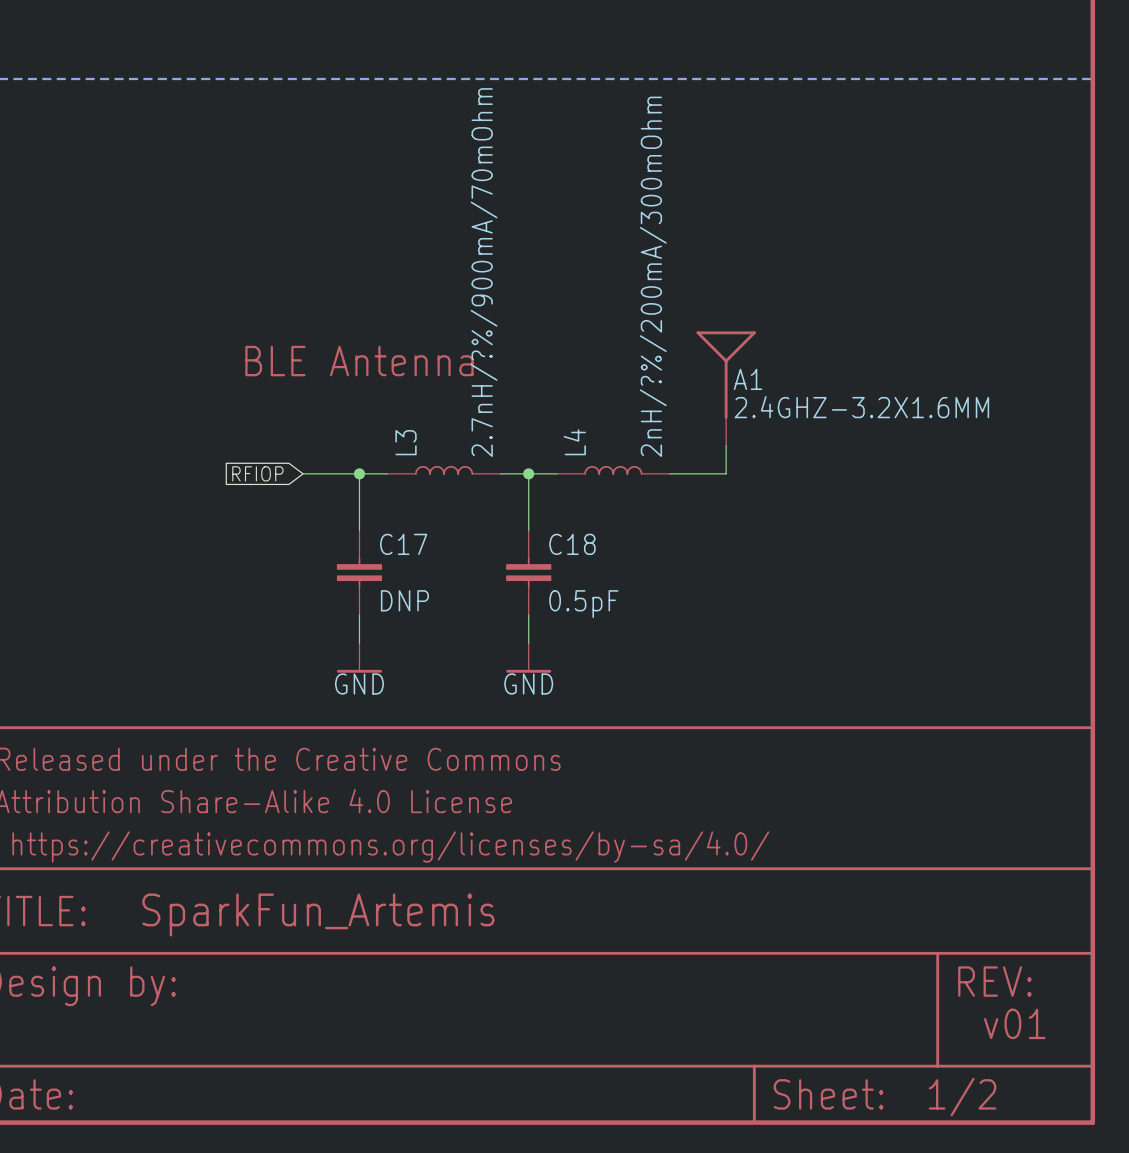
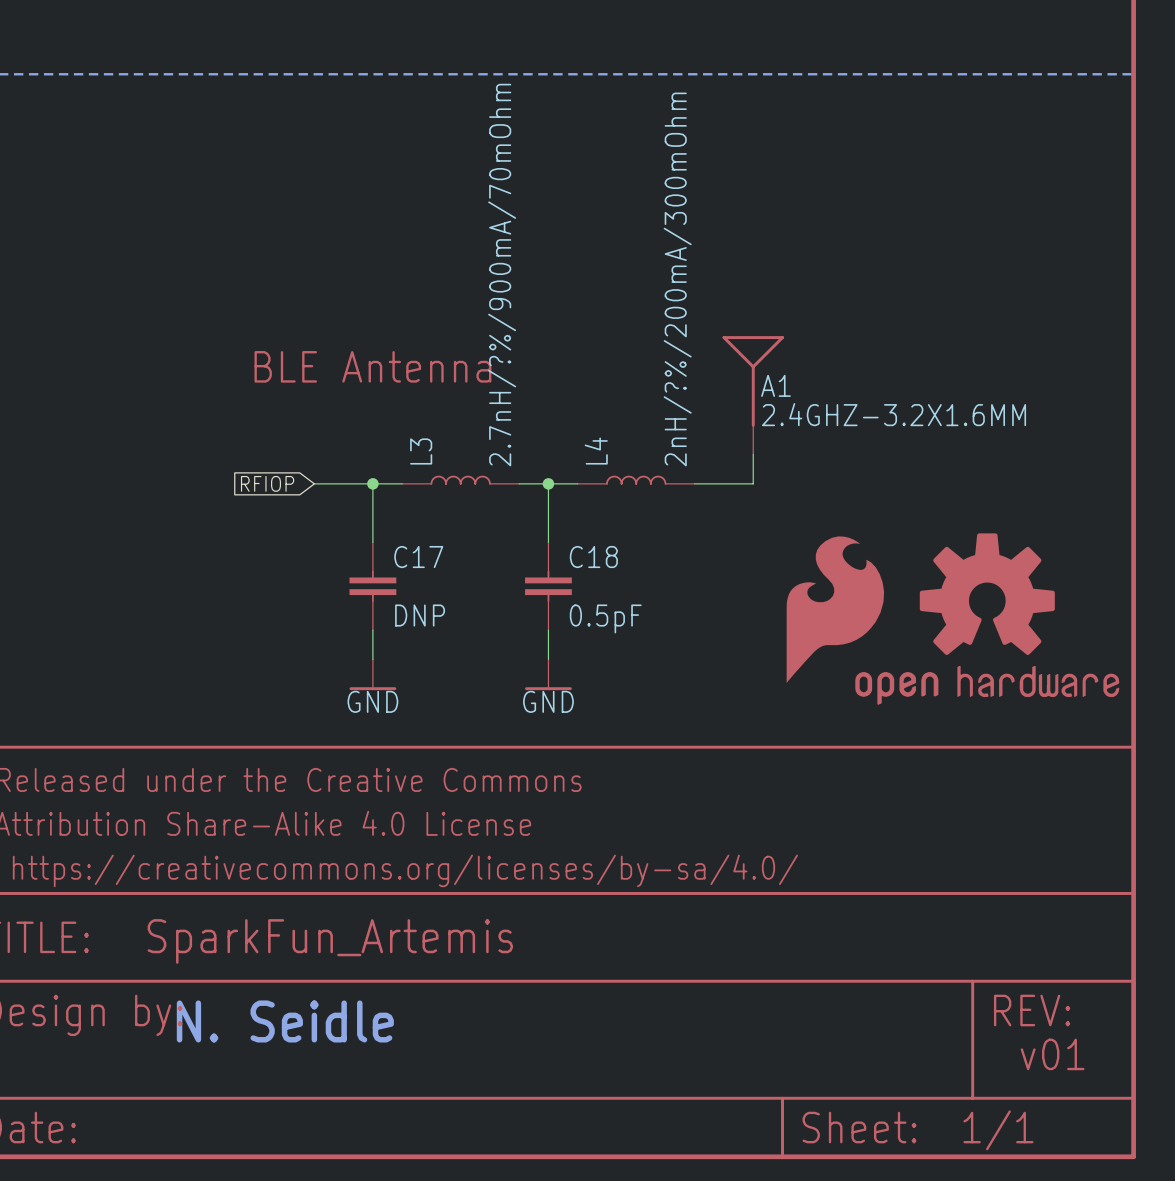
part: none -> (835, 609)
part: none -> (987, 619)
text: none -> N. Seidle (285, 1021)
part text: 1/2 (962, 1097) -> 1/1 (998, 1130)

